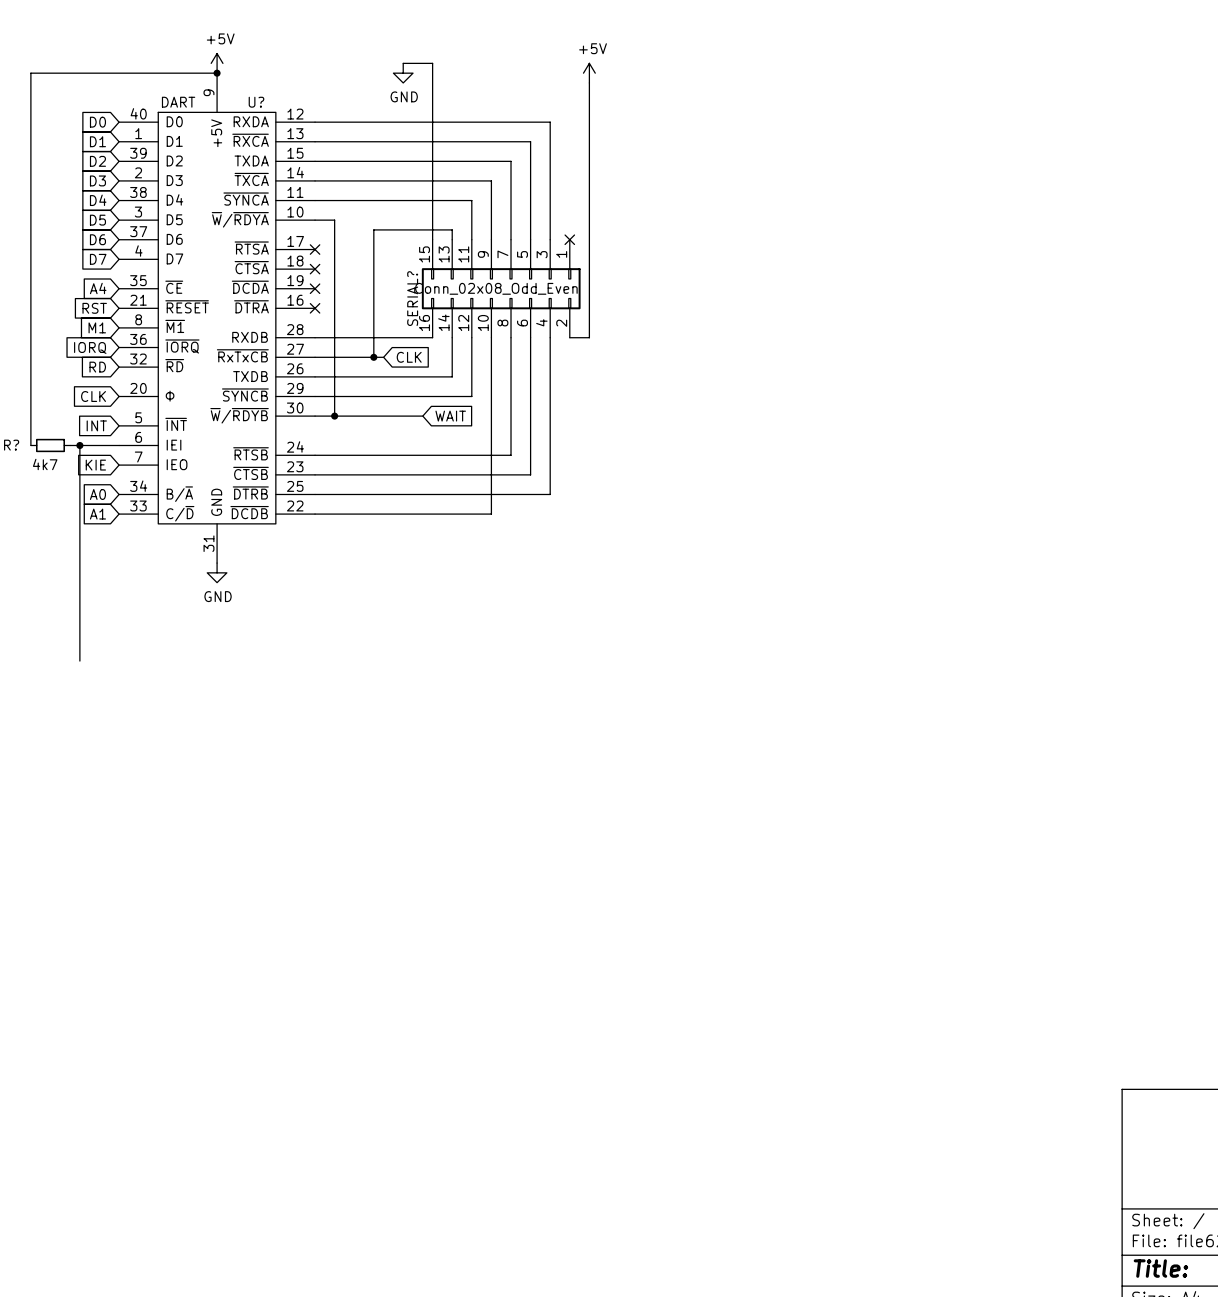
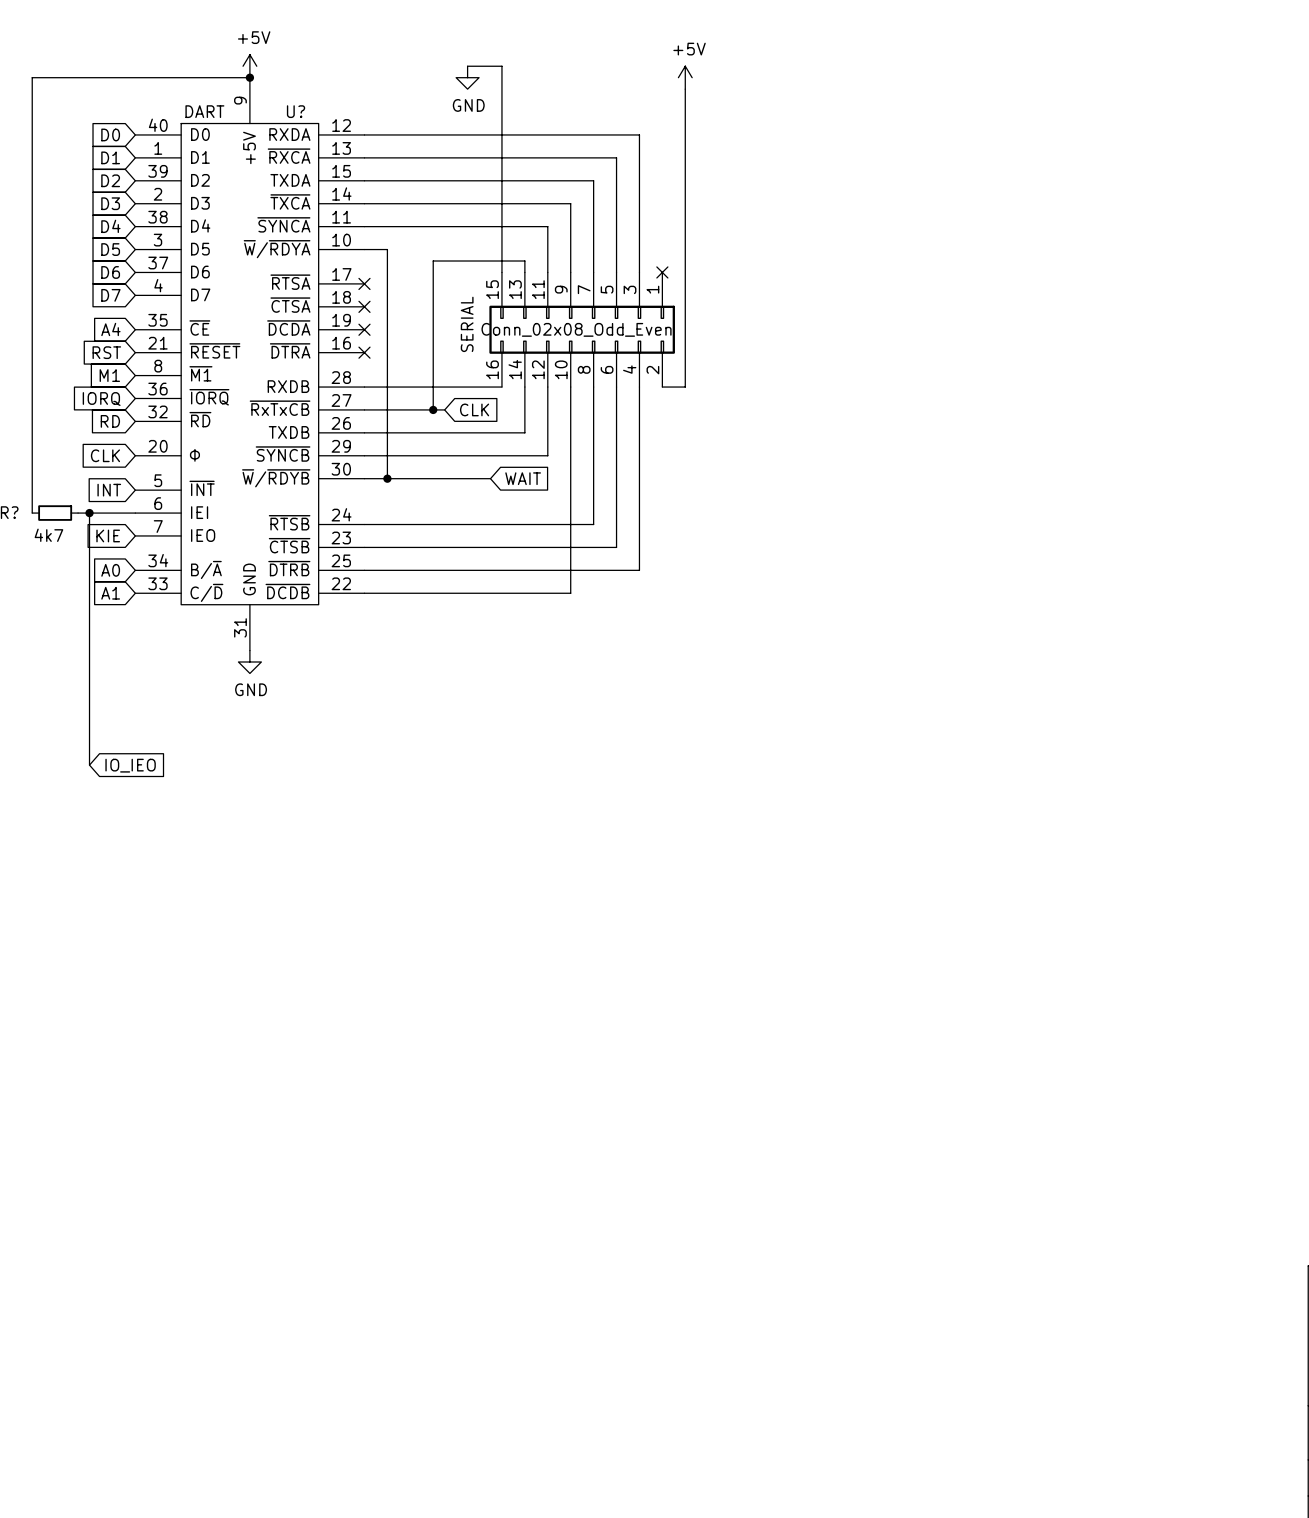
SERIAL? name: SERIAL? (412, 298) -> SERIAL (467, 324)
global label: none -> IO_IEO (130, 765)

